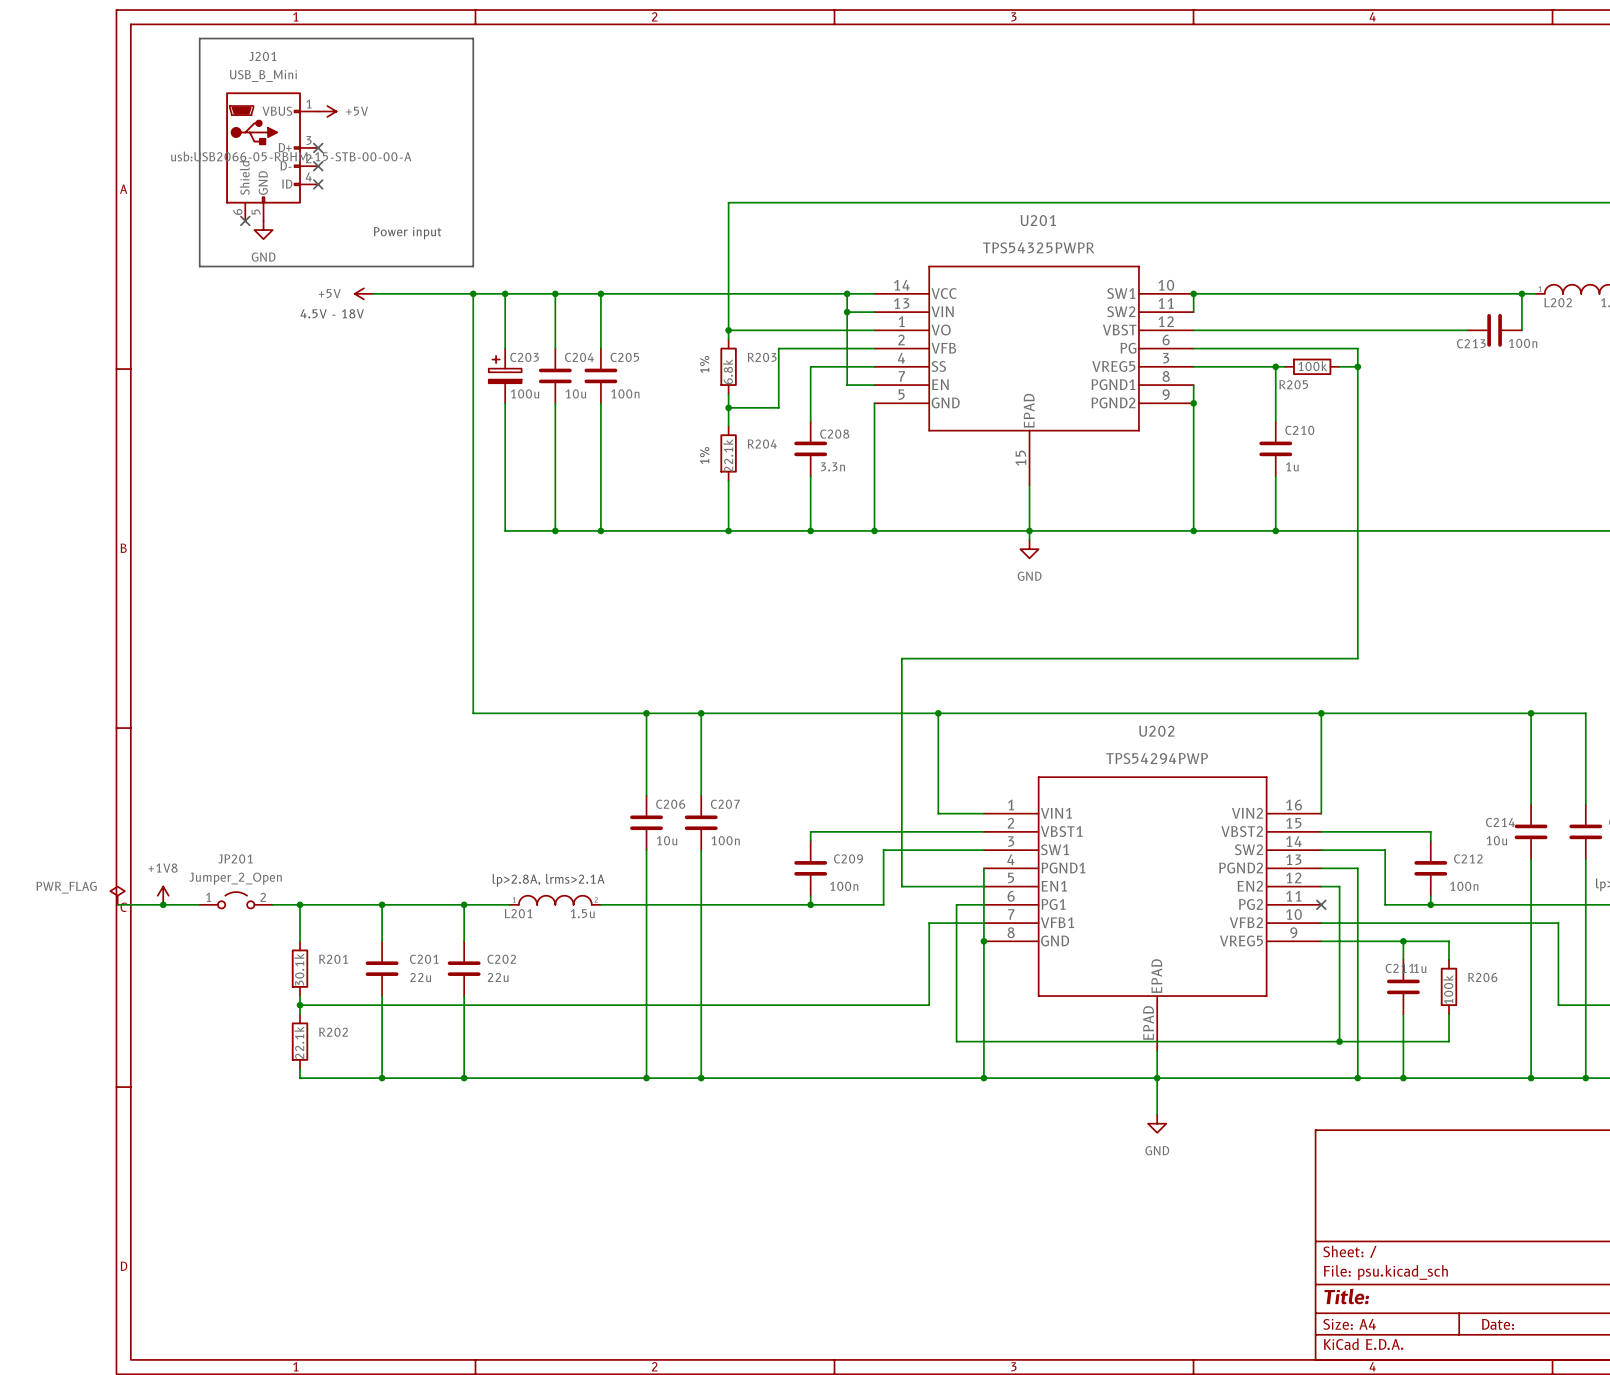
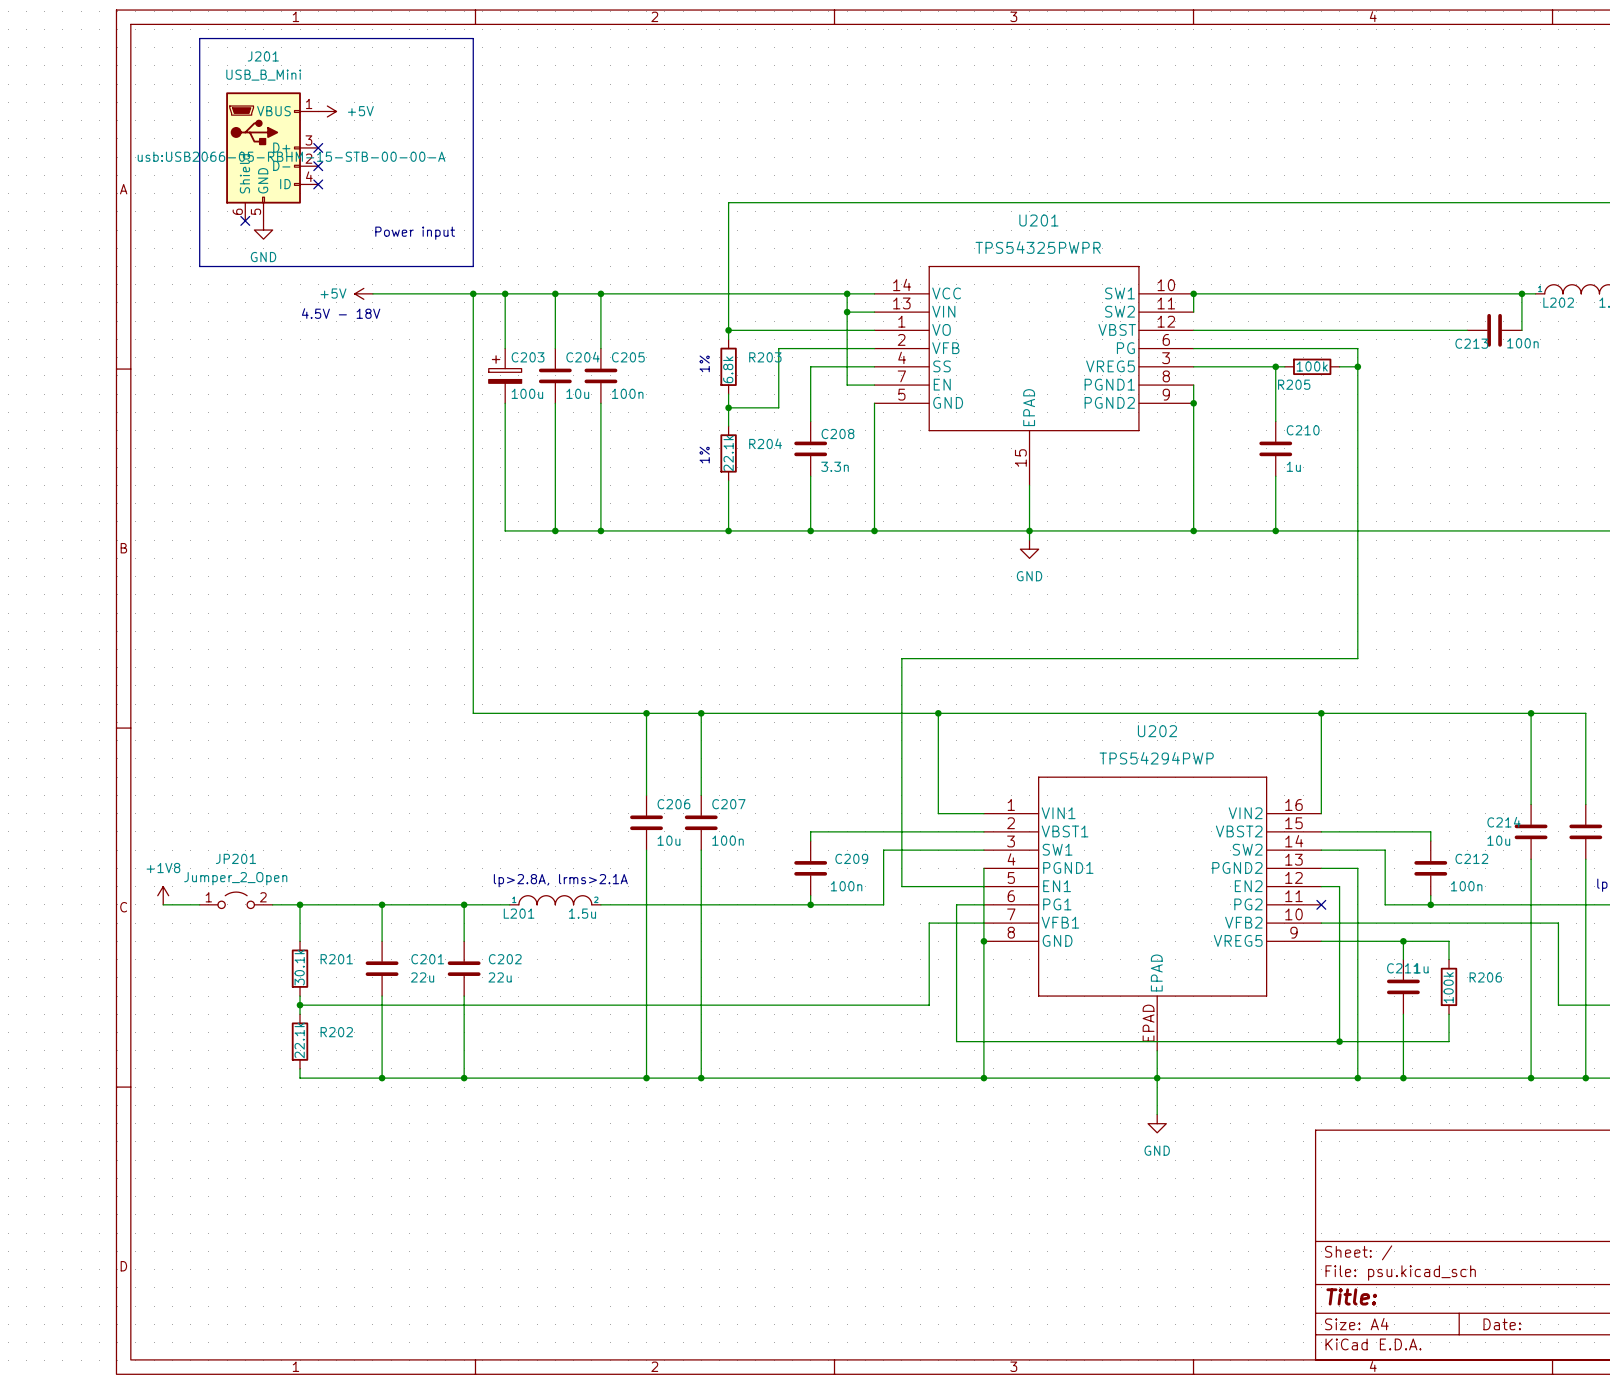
power symbol: PWR_FLAG (117, 895) -> none
wire: (117, 904) (163, 904) -> none
junction: (163, 904) -> none

